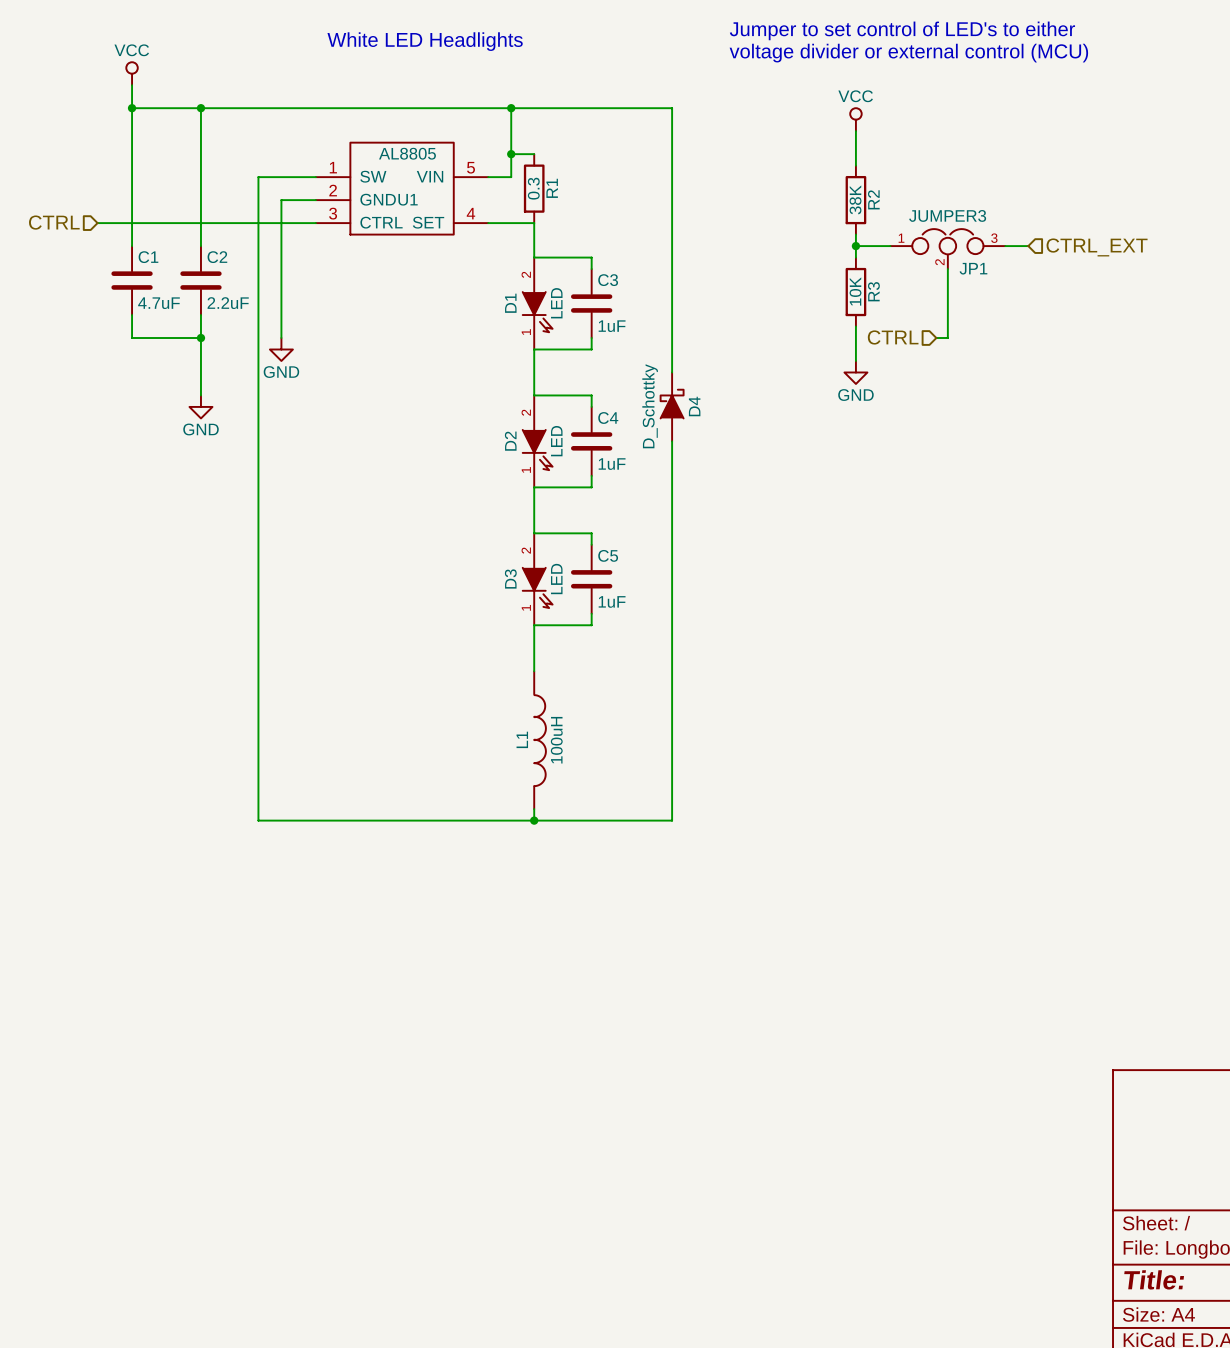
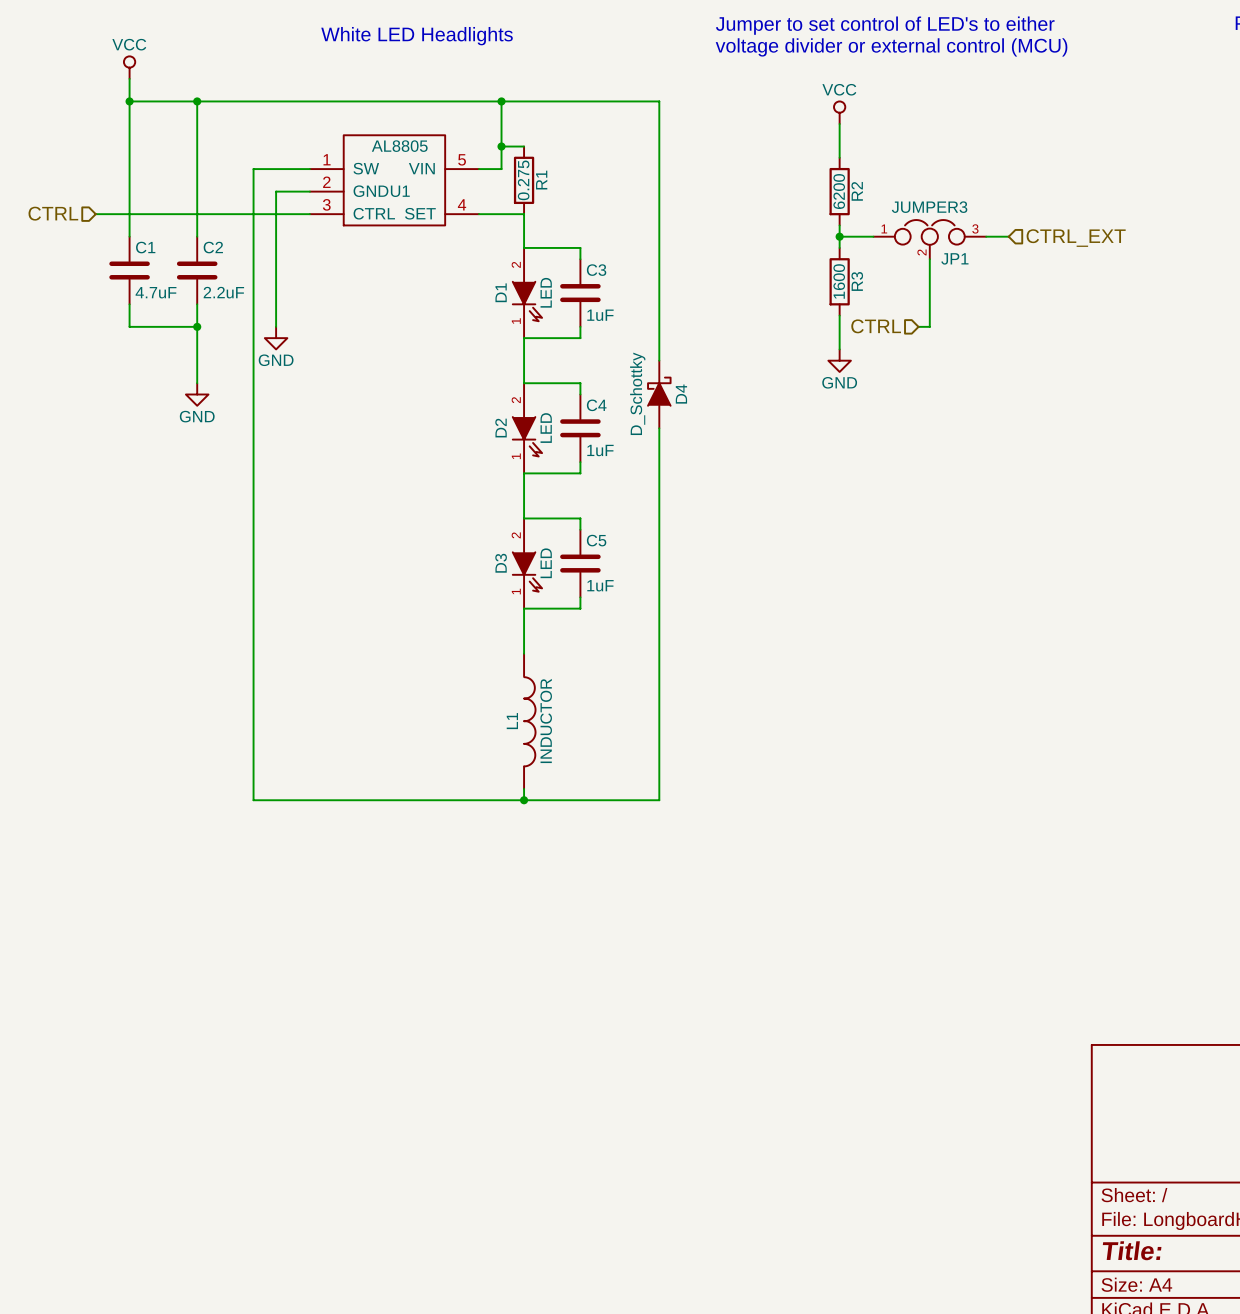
R1 value: 0.3 (533, 188) -> 0.275 (523, 180)
R2 value: 38K (855, 199) -> 6200 (839, 191)
R3 value: 10K (855, 291) -> 1600 (839, 281)
L1 value: 100uH (556, 740) -> INDUCTOR (546, 720)

